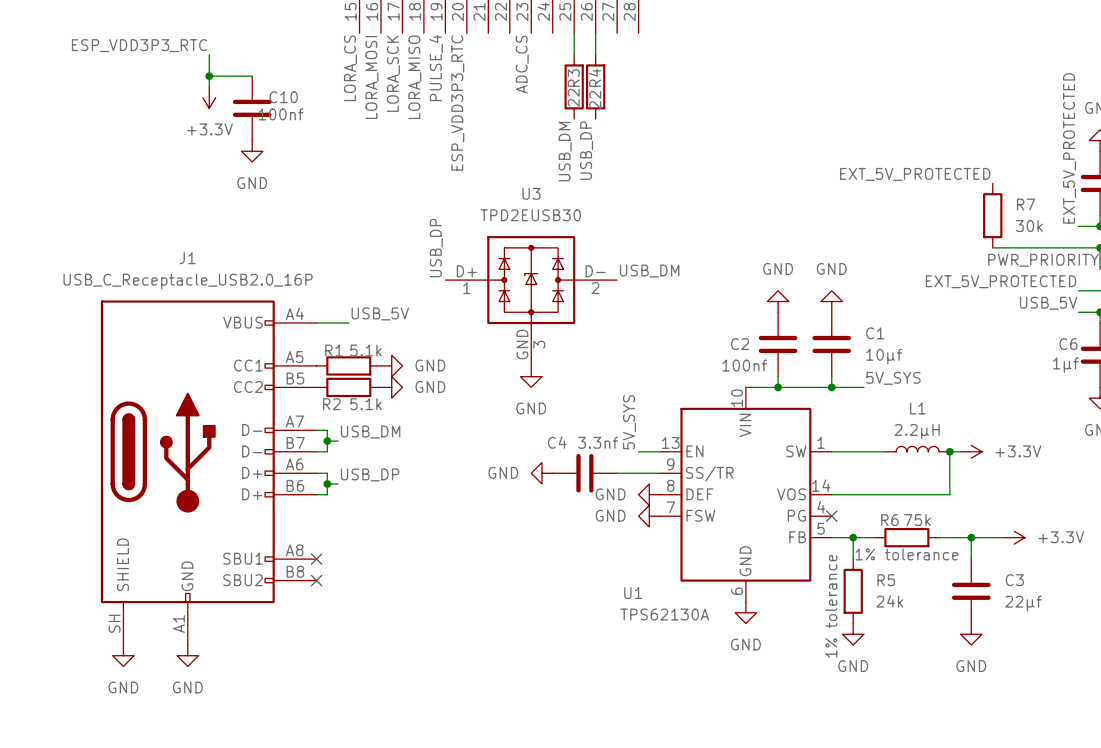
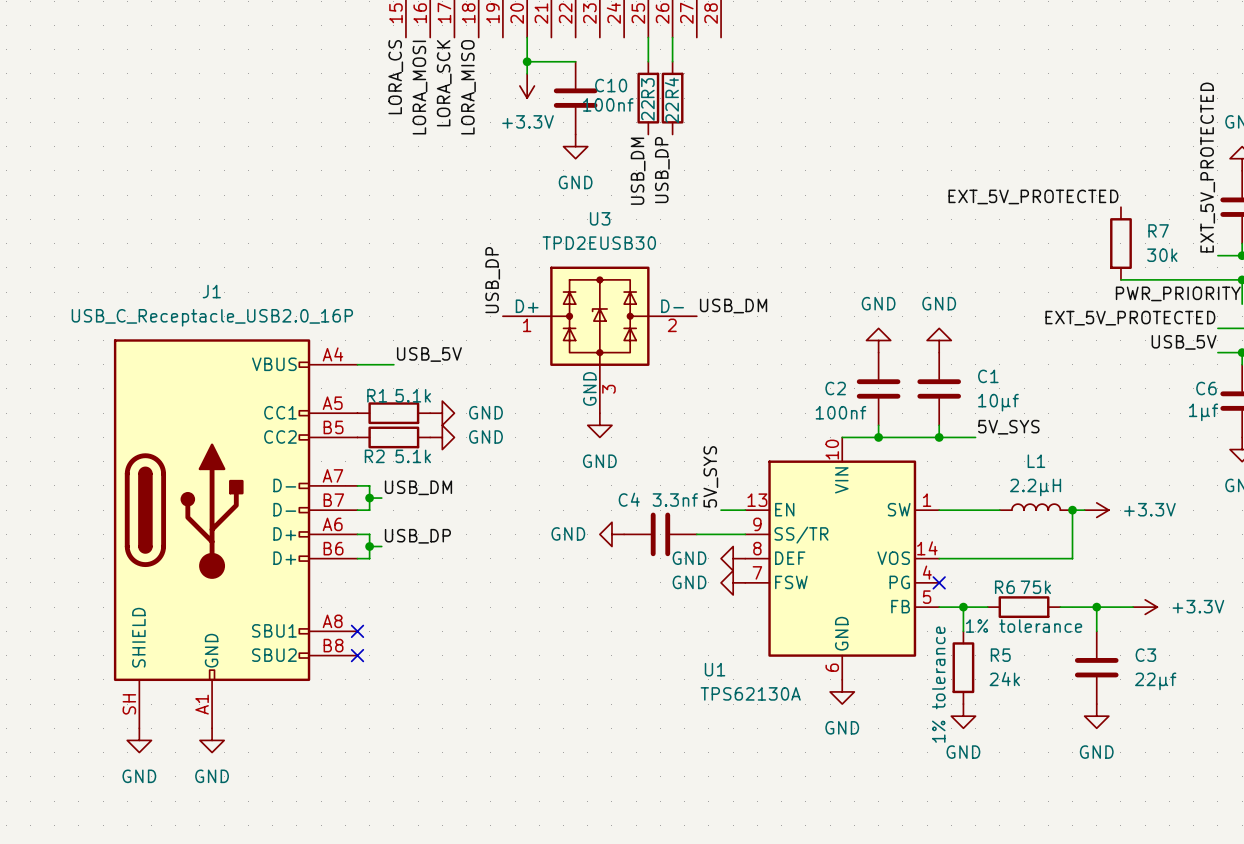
wire: none -> (527, 37) (527, 73)
label: ESP_VDD3P3_RTC (139, 45) -> none
wire: (209, 54) (209, 86) -> none
wire: none -> (527, 61) (575, 61)
junction: none -> (527, 61)
label: ADC_CS (522, 64) -> none
label: PULSE_4 (436, 68) -> none
wire: (209, 76) (252, 76) -> none
junction: (209, 76) -> none
power symbol: none -> +3.3V (527, 86)
power symbol: +3.3V (209, 97) -> none
label: ESP_VDD3P3_RTC (457, 103) -> none
C10 position: (252, 108) -> (575, 98)
power symbol: none -> GND (575, 146)
power symbol: GND (252, 151) -> none

